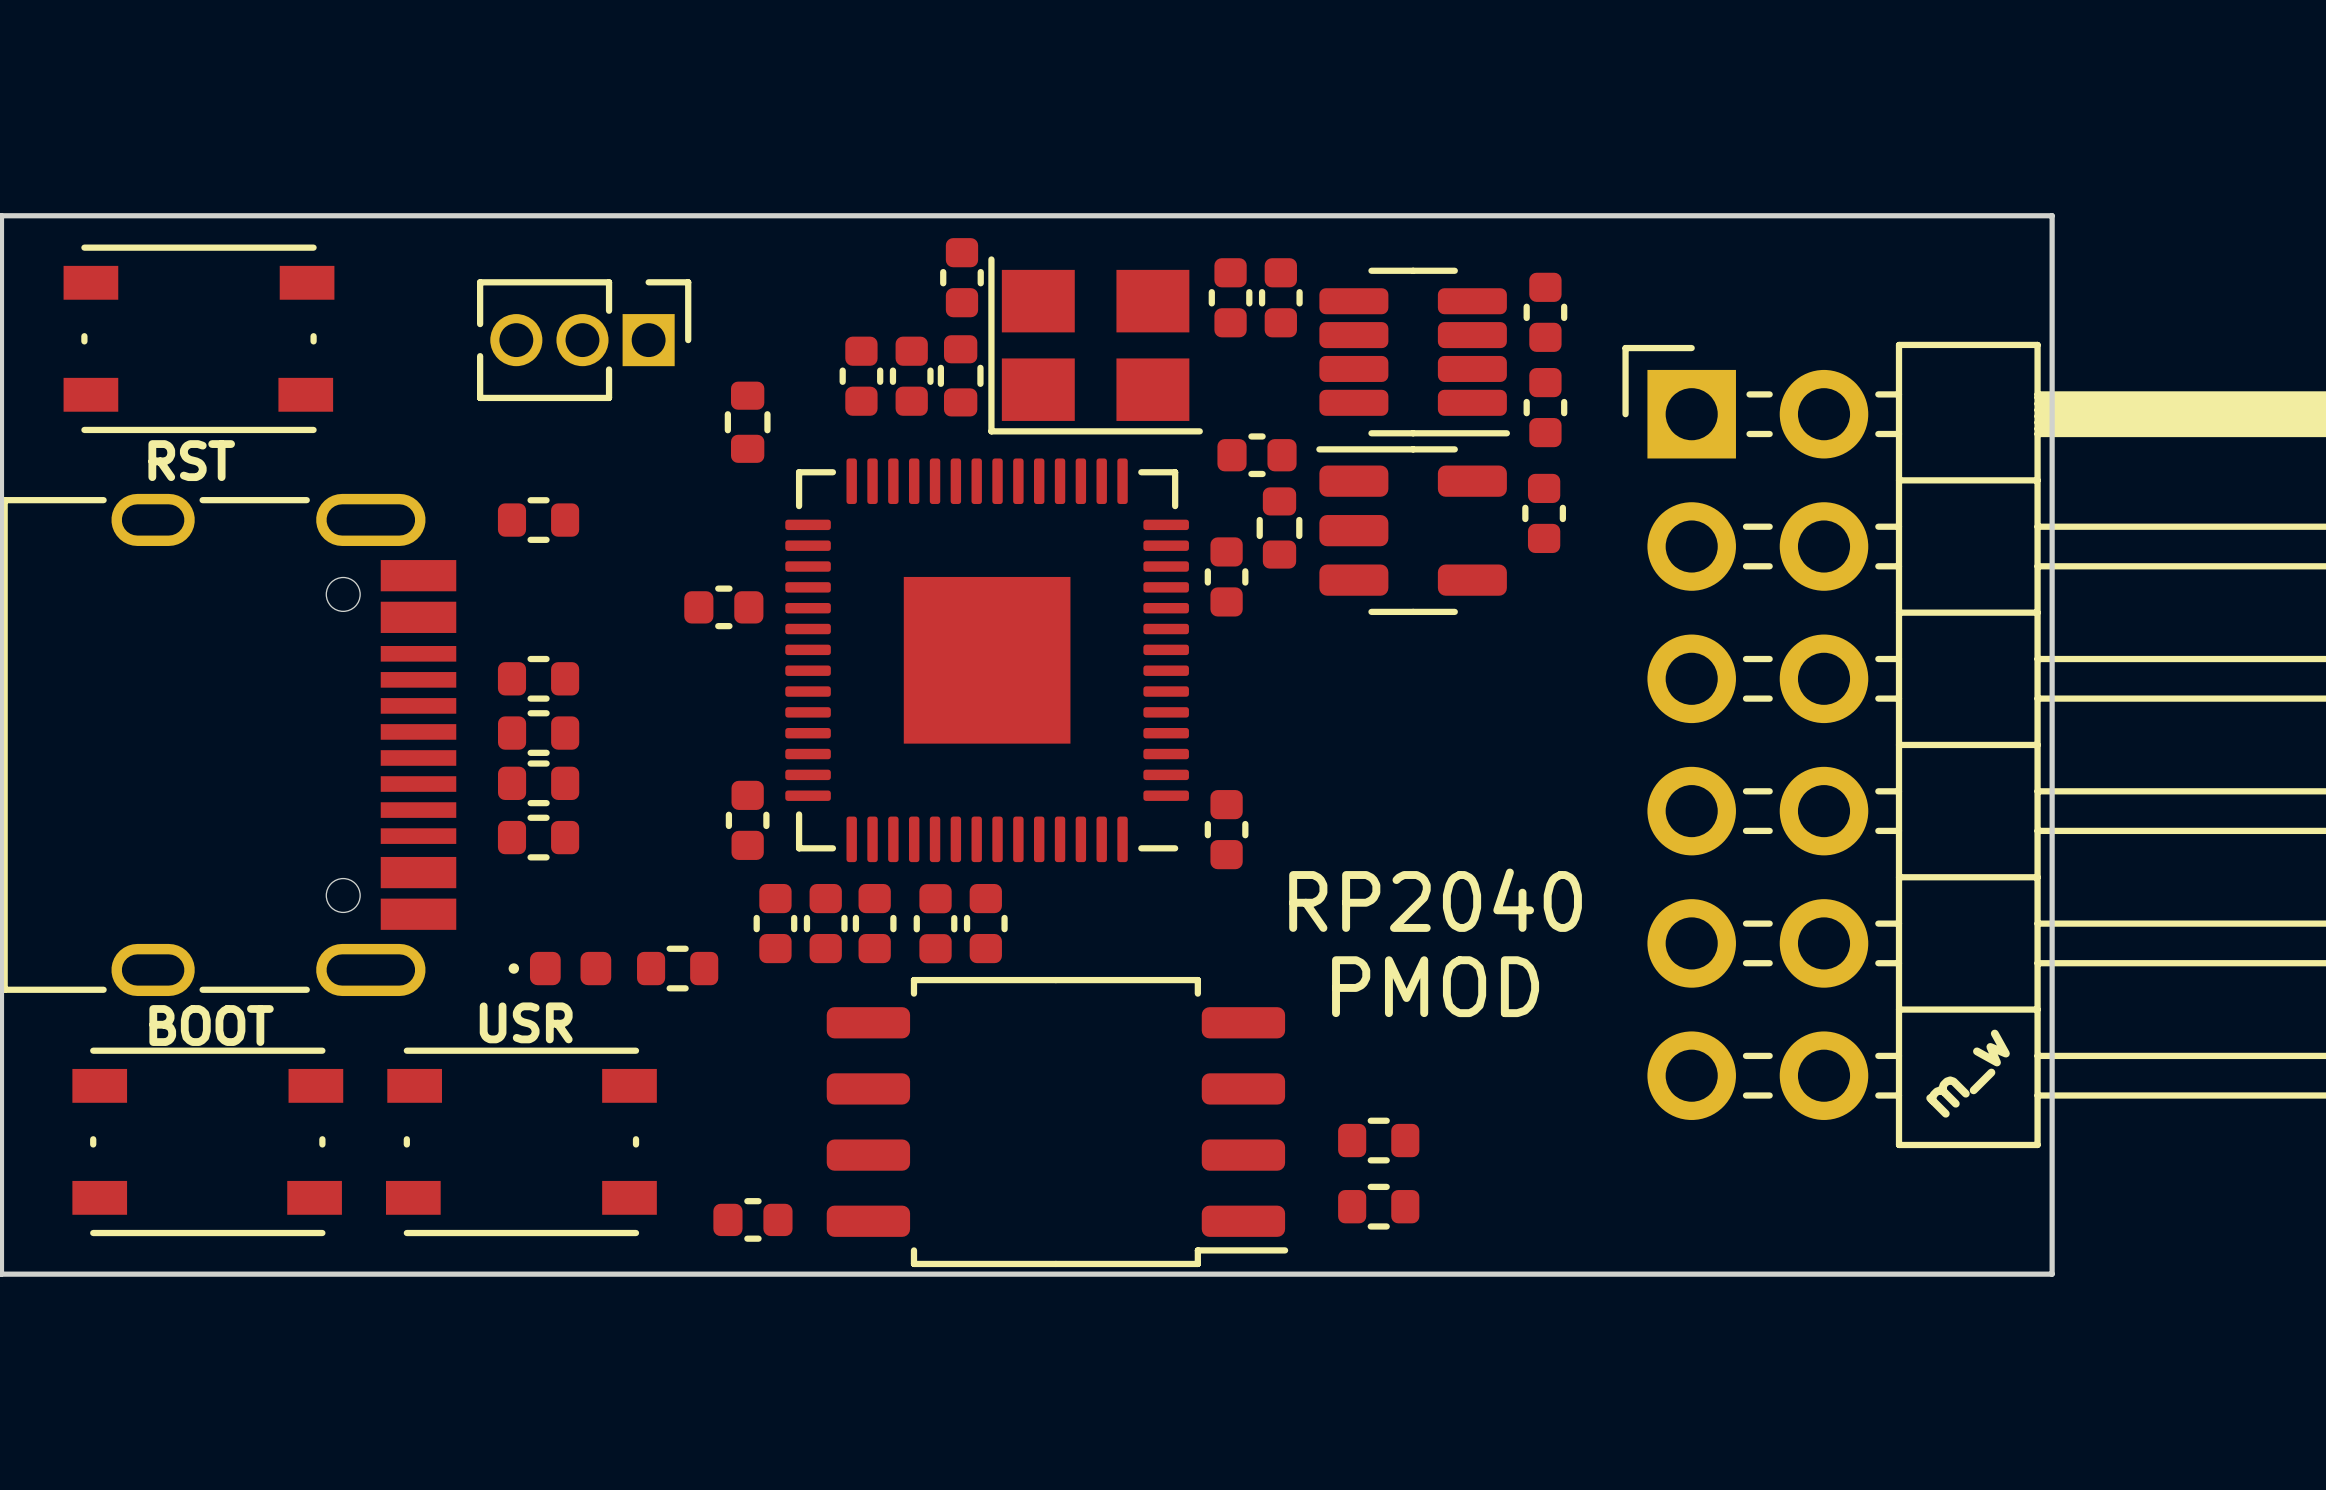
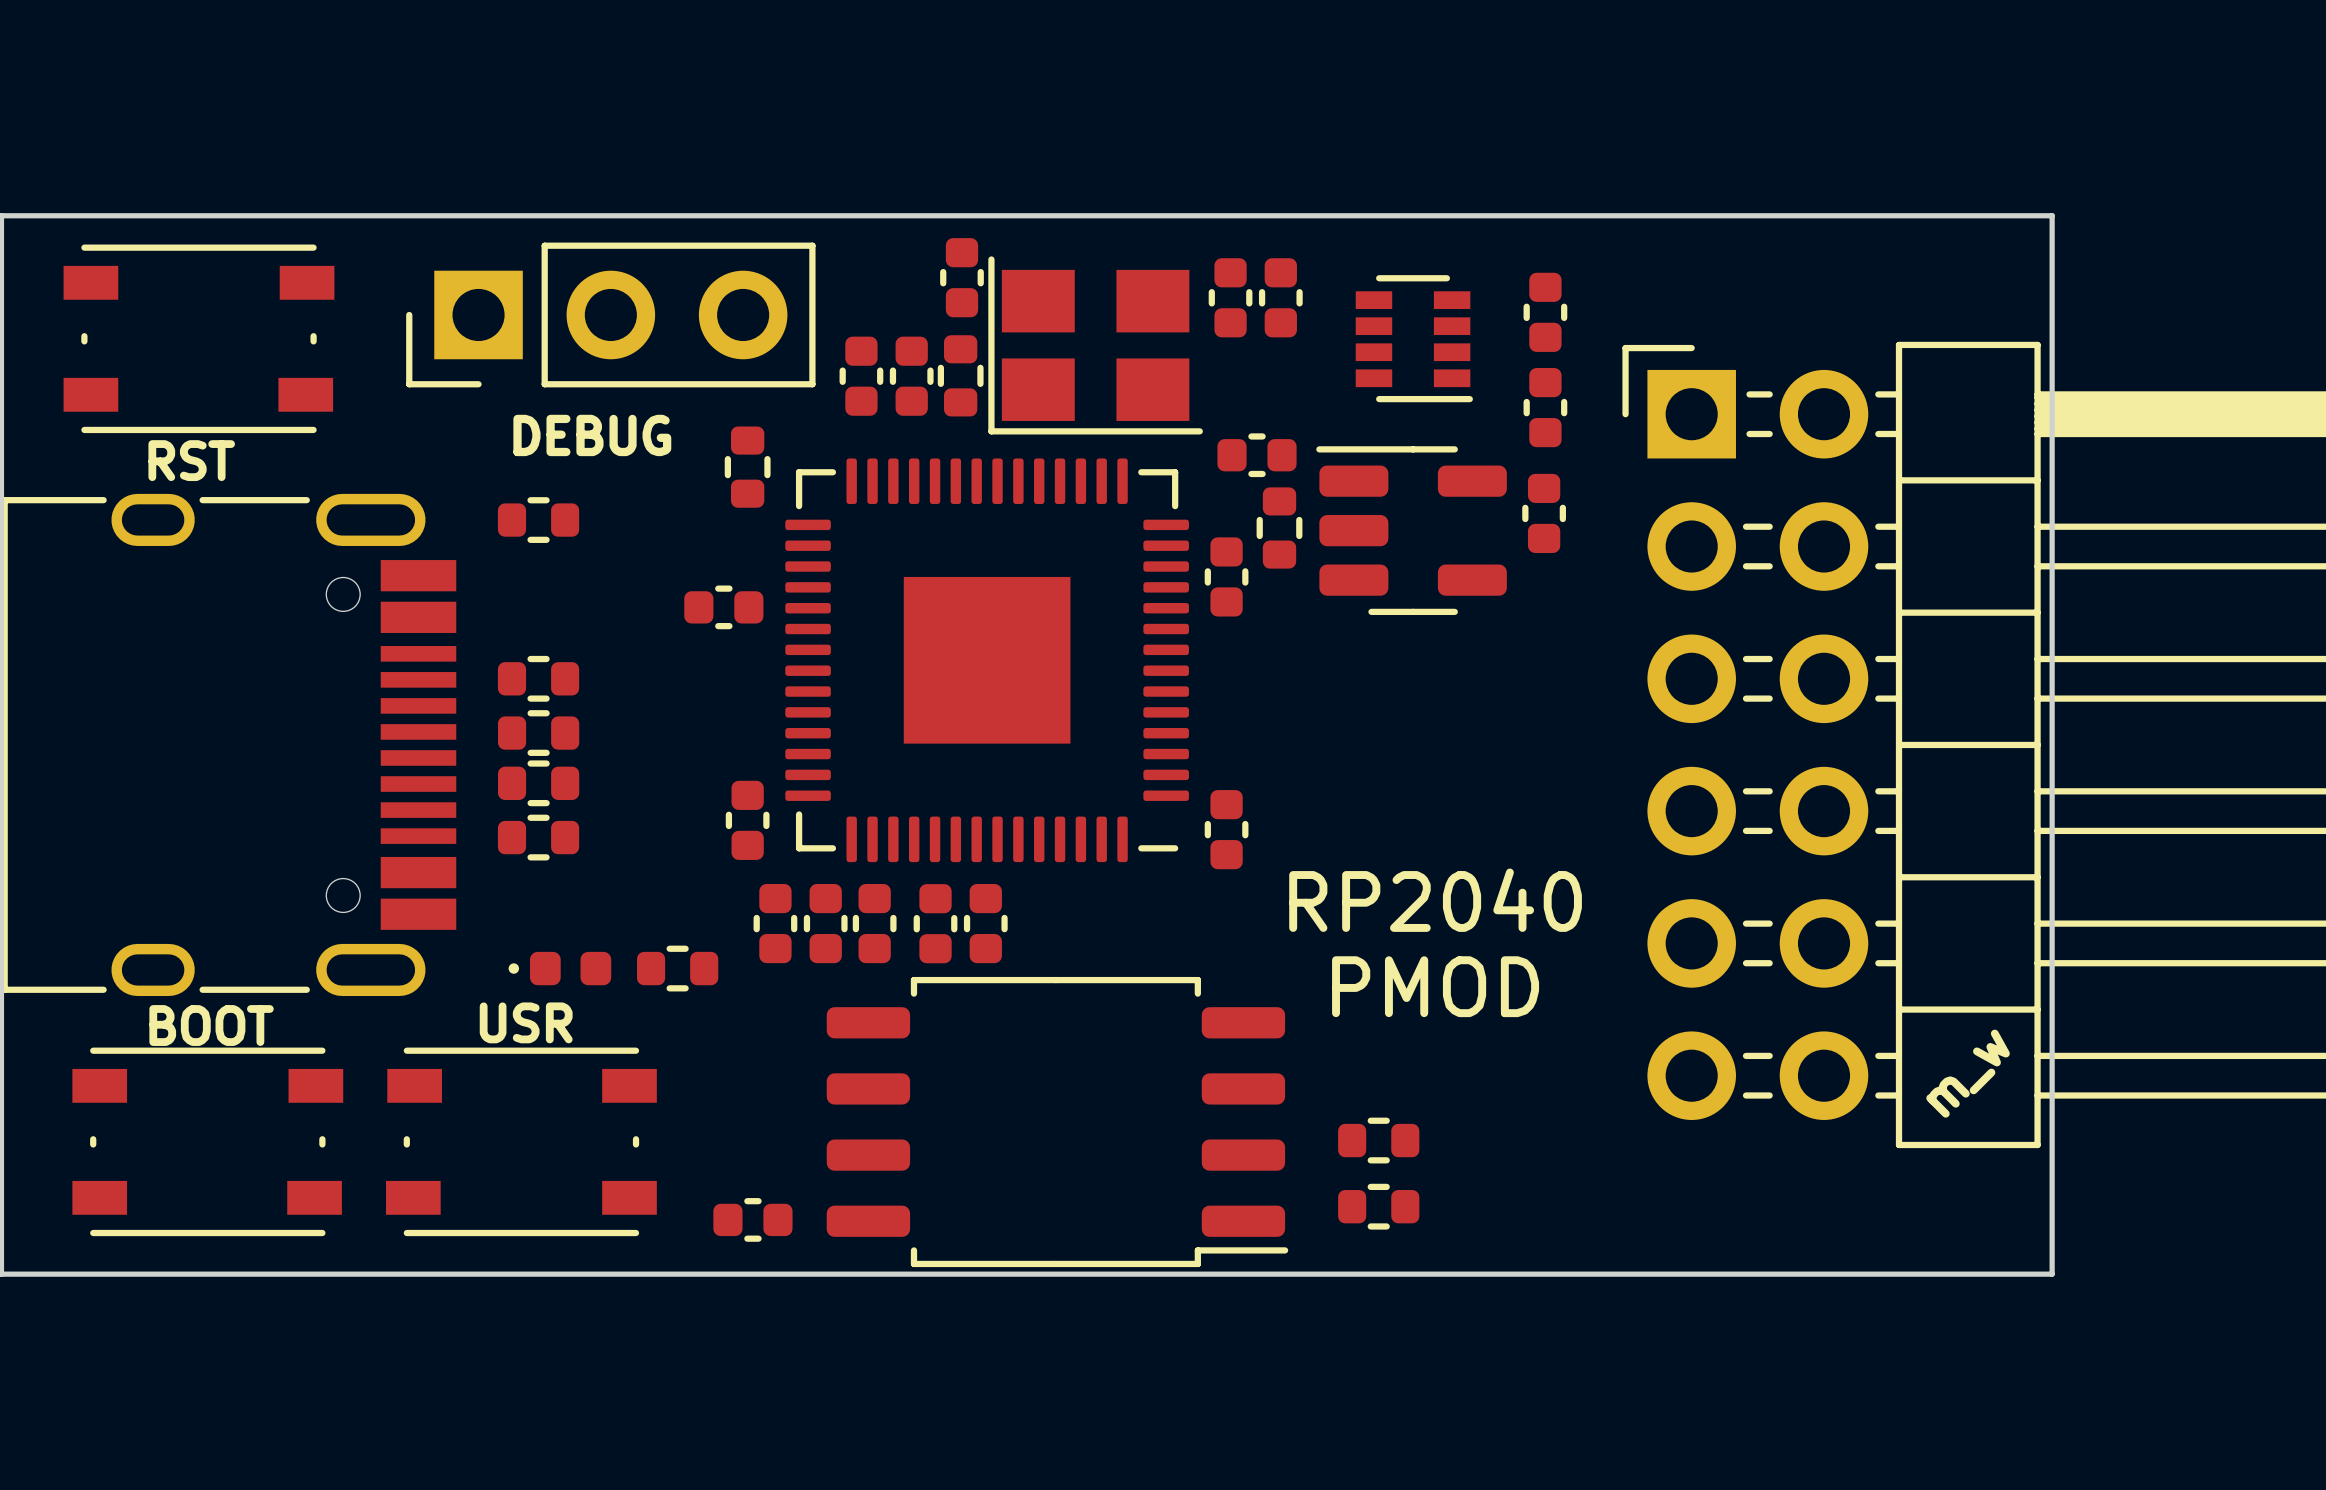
part footprint: [1319, 267, 1511, 437] -> [1355, 275, 1473, 403]
part footprint: [477, 279, 692, 402] -> [406, 242, 816, 388]
part position: (747, 422) -> (747, 467)
text: none -> DEBUG (592, 435)

